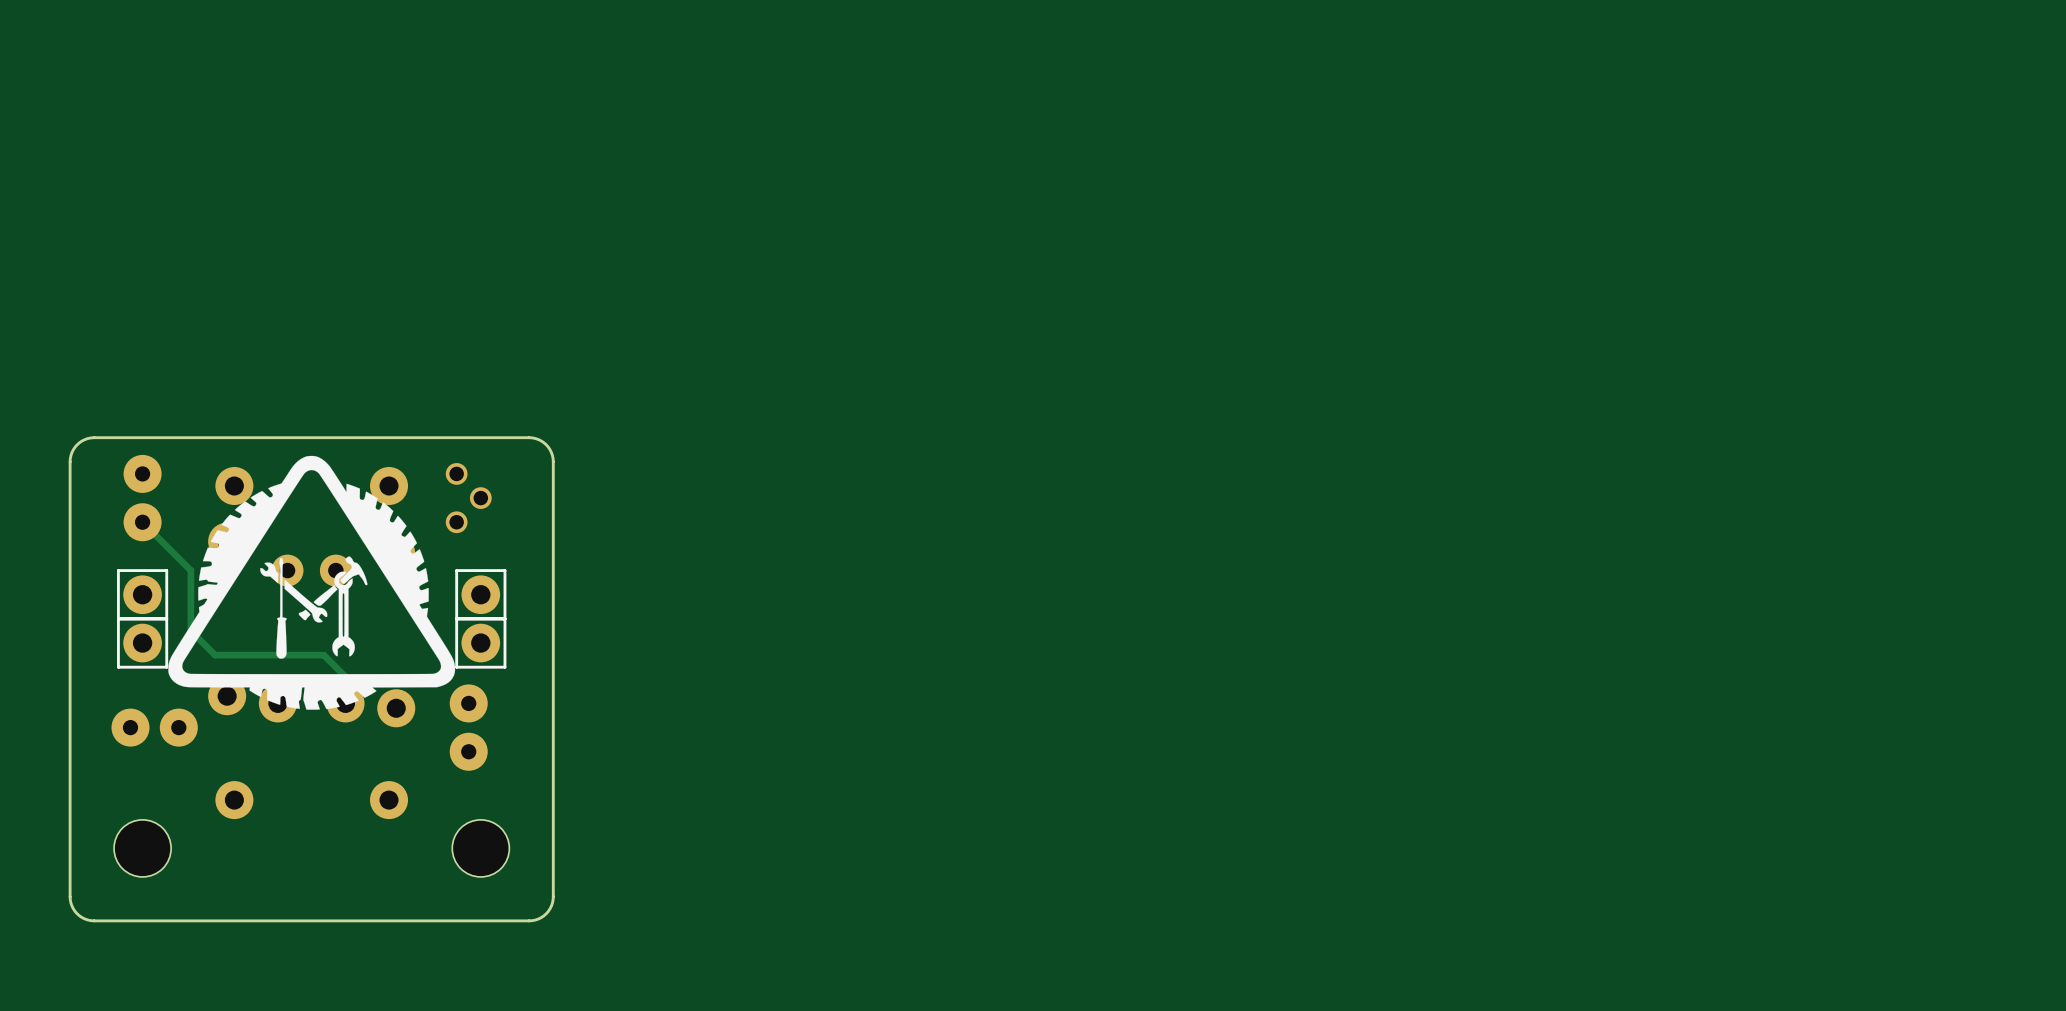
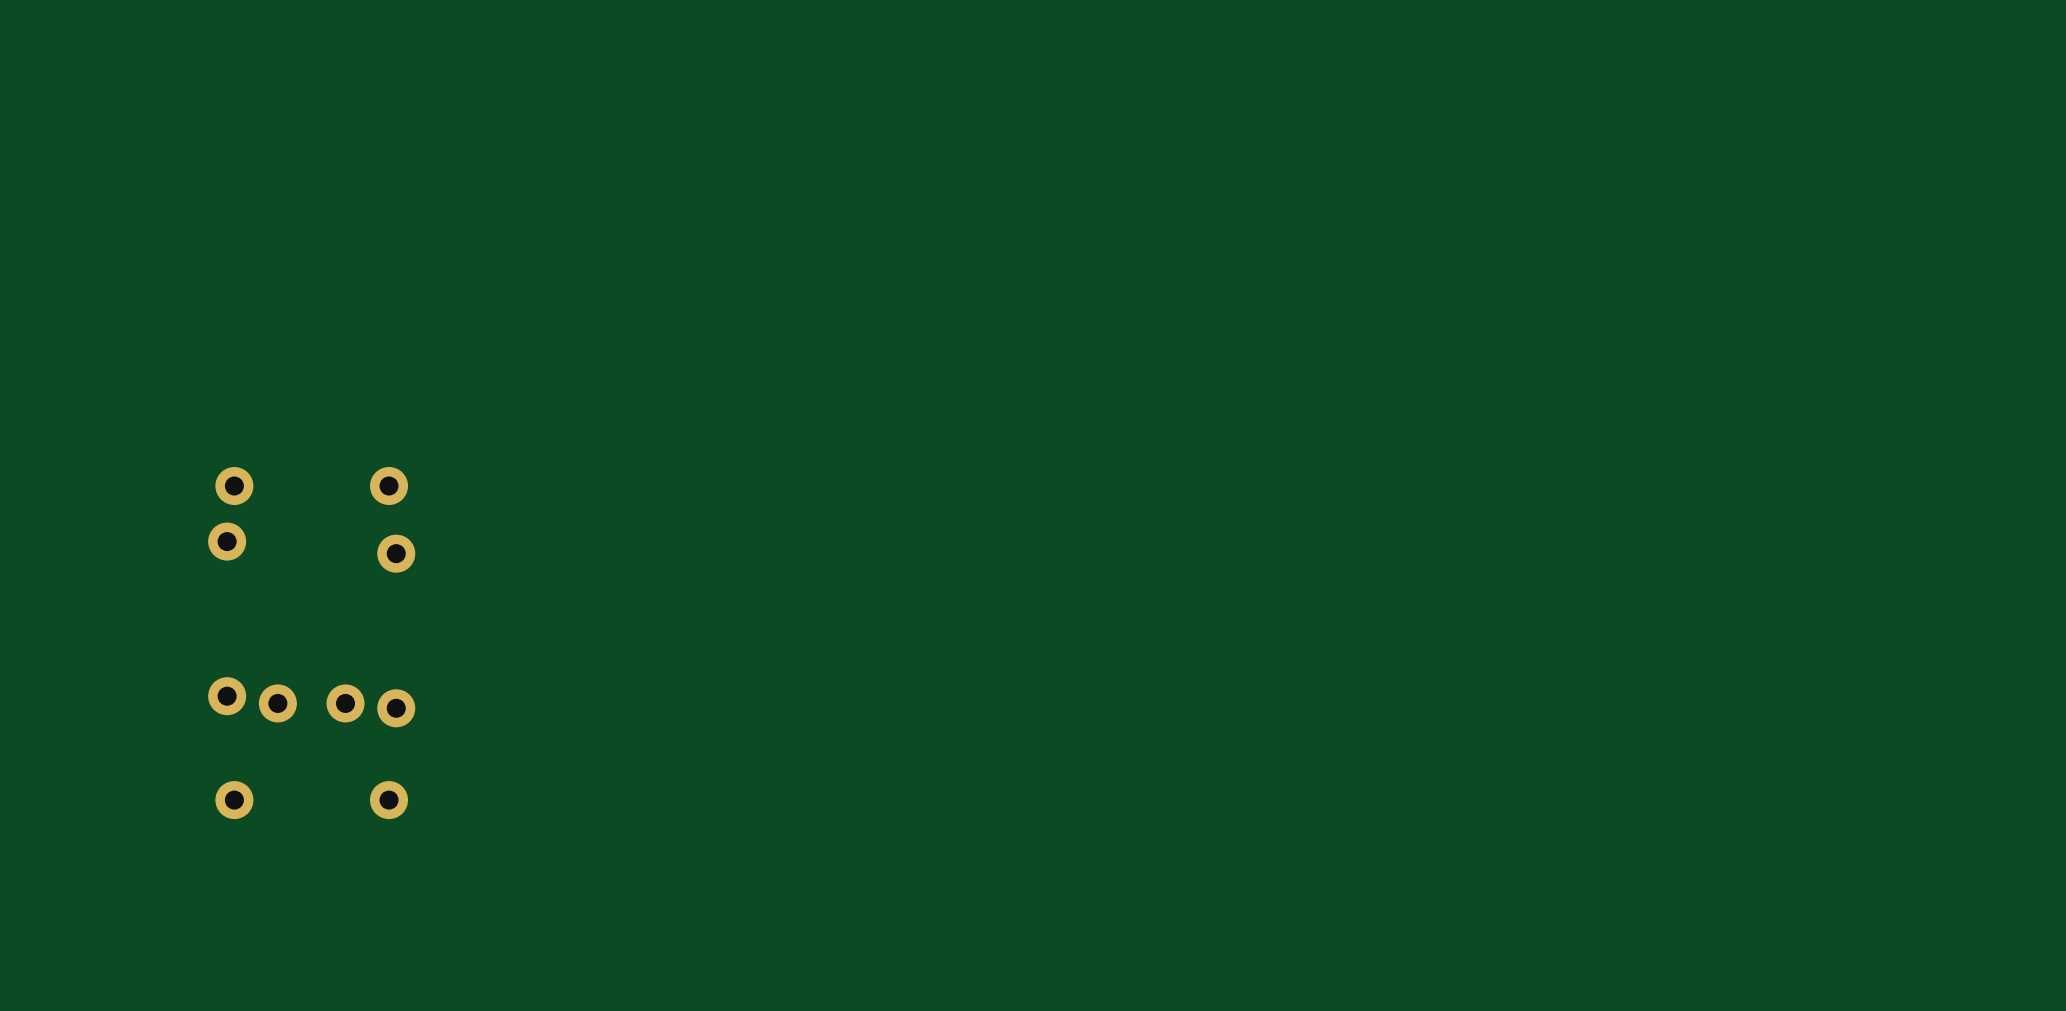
board edge: (529, 437) (94, 437) (85, 439) (77, 444) (71, 452) (70, 461) (70, 896) (71, 905) (77, 913) (85, 919) (94, 920) (529, 920) (538, 919) (546, 913) (551, 905) (553, 896) (553, 461) (551, 452) (546, 444) (538, 439) (529, 437) -> none
drawing: [168, 455, 456, 710] -> none
part: (142, 498) -> none
part: (468, 498) -> none
track: (142, 522) (190, 570) (190, 630) (215, 655) (323, 655) (345, 676) (345, 703) -> none
part: (311, 570) -> none
part: (142, 594) -> none
part: (480, 594) -> none
part: (142, 643) -> none
part: (480, 643) -> none
part: (154, 727) -> none
part: (468, 727) -> none
part: (142, 848) -> none
part: (480, 848) -> none

